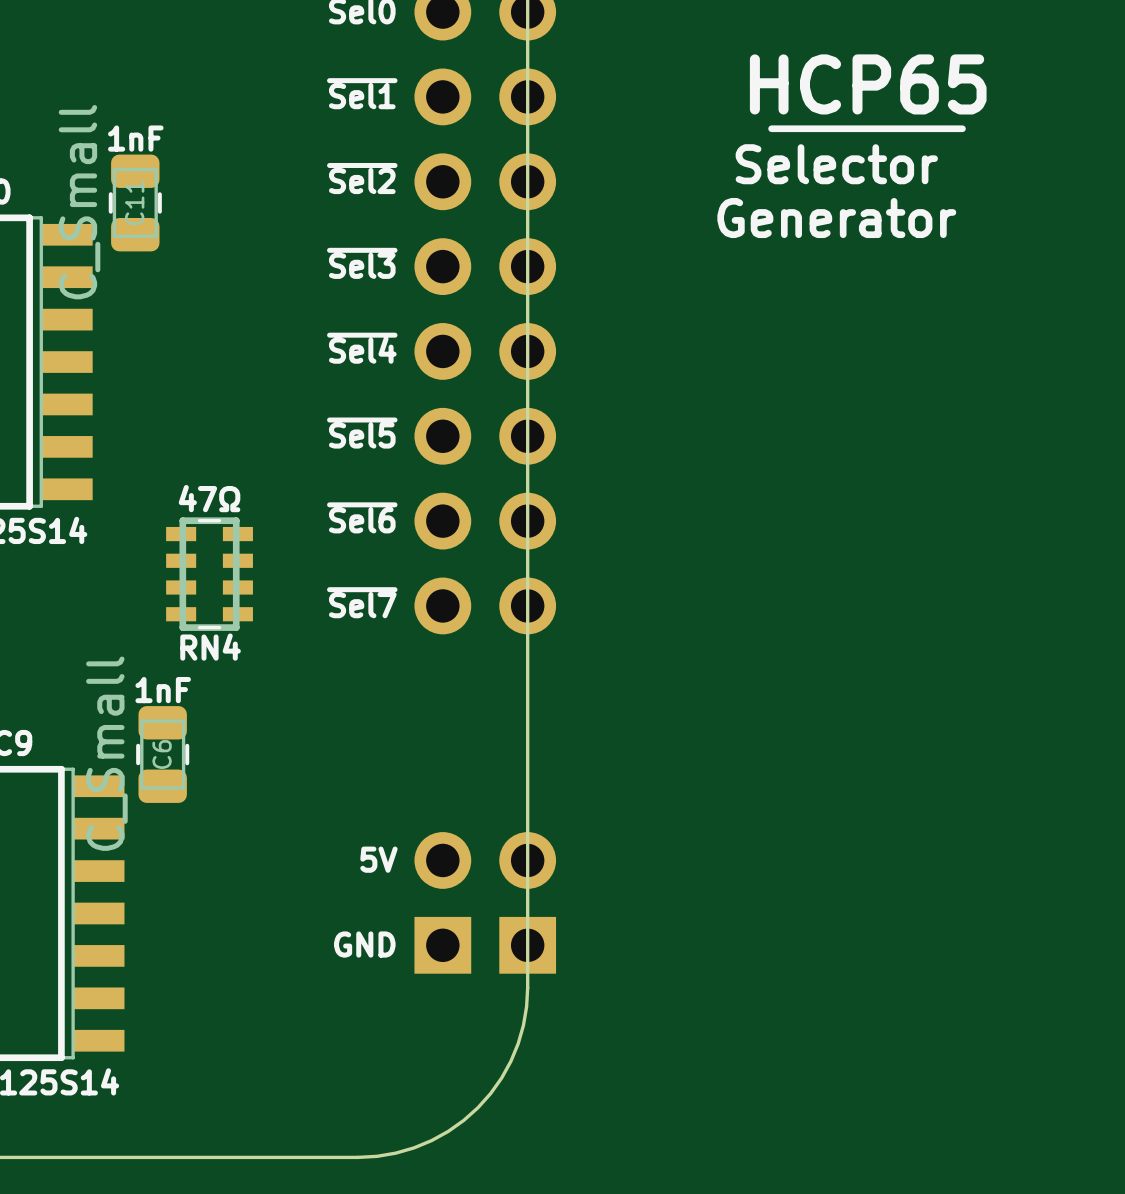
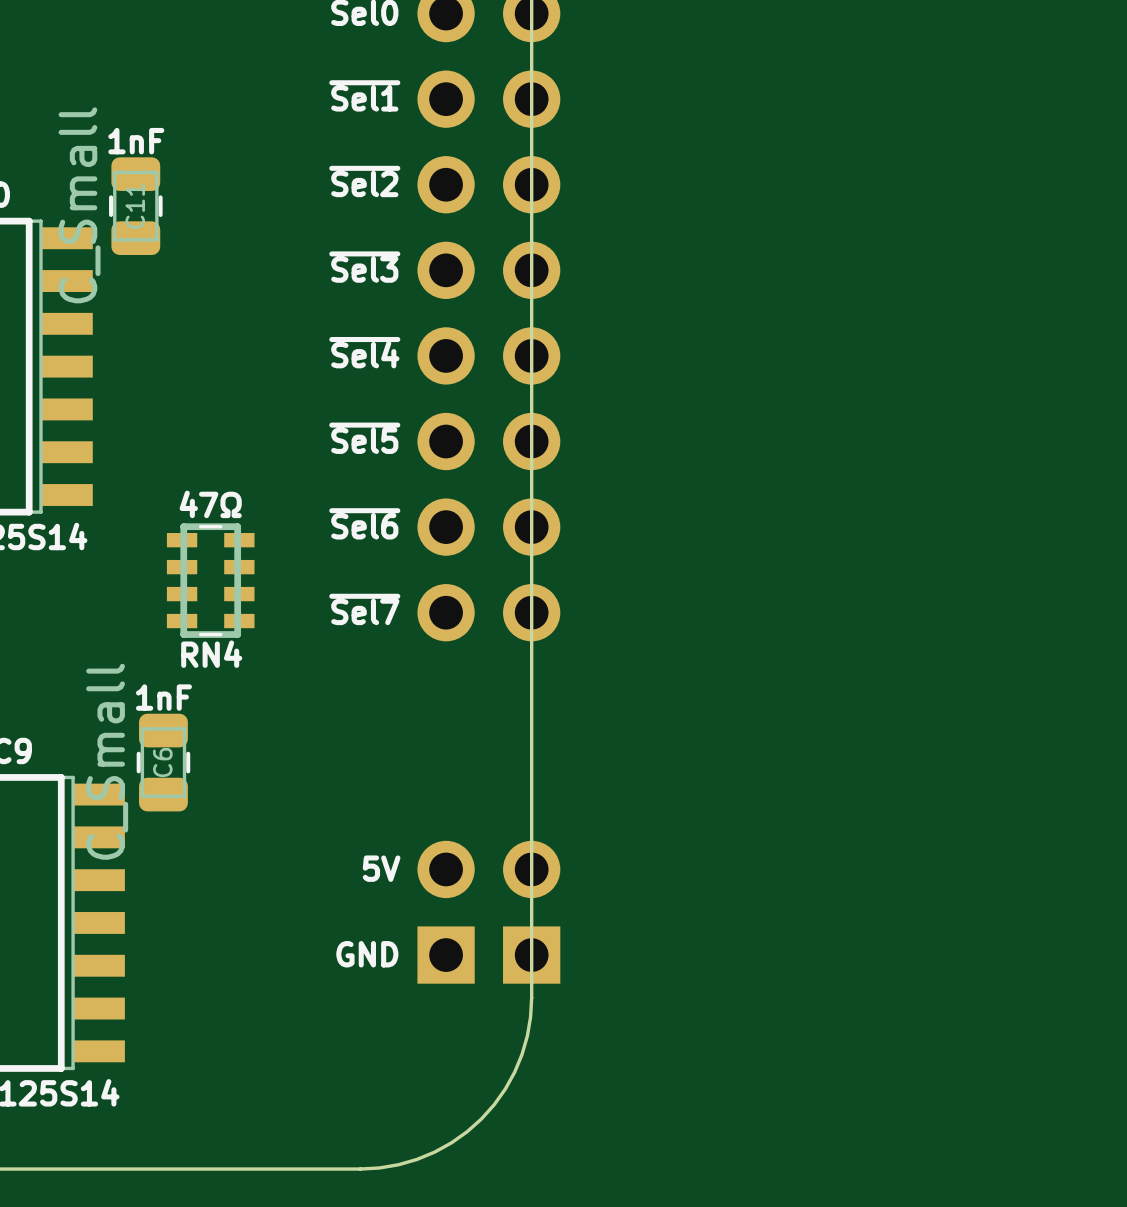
text: HCP65 (868, 84) -> none
line: (771, 128) (962, 128) -> none
text: Selector (836, 164) -> none
text: Generator (836, 218) -> none

